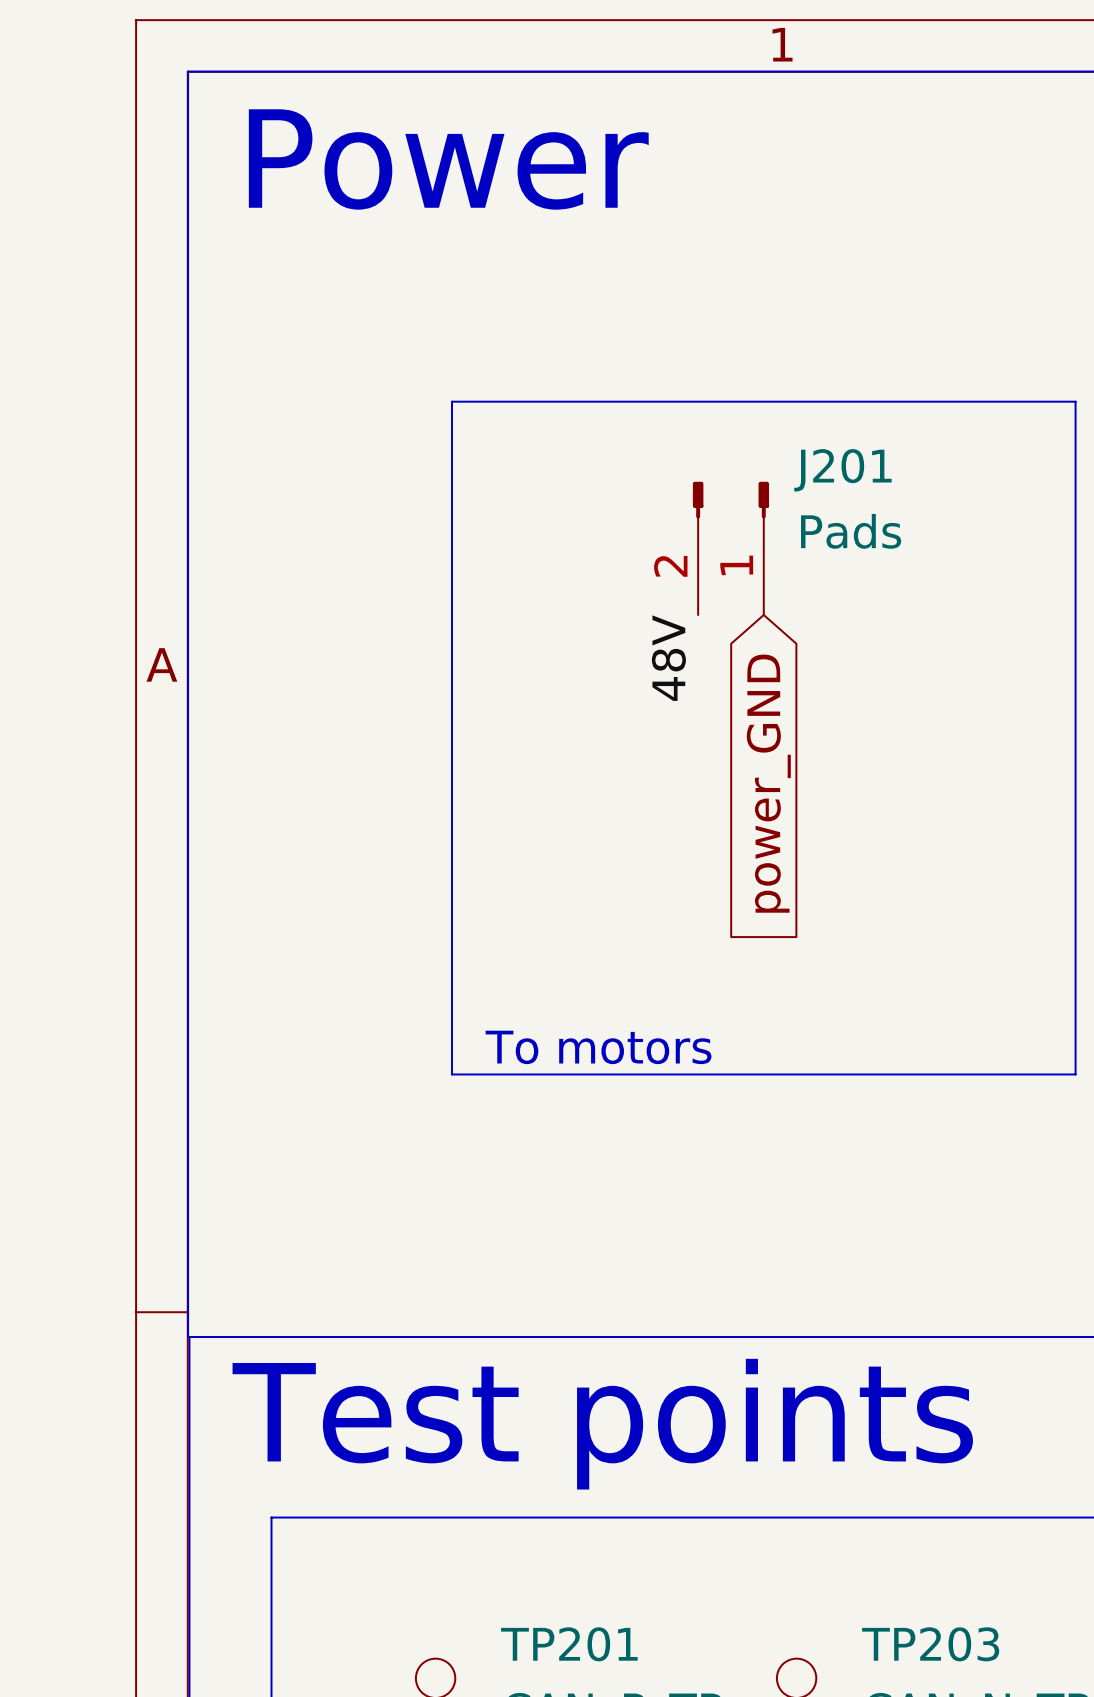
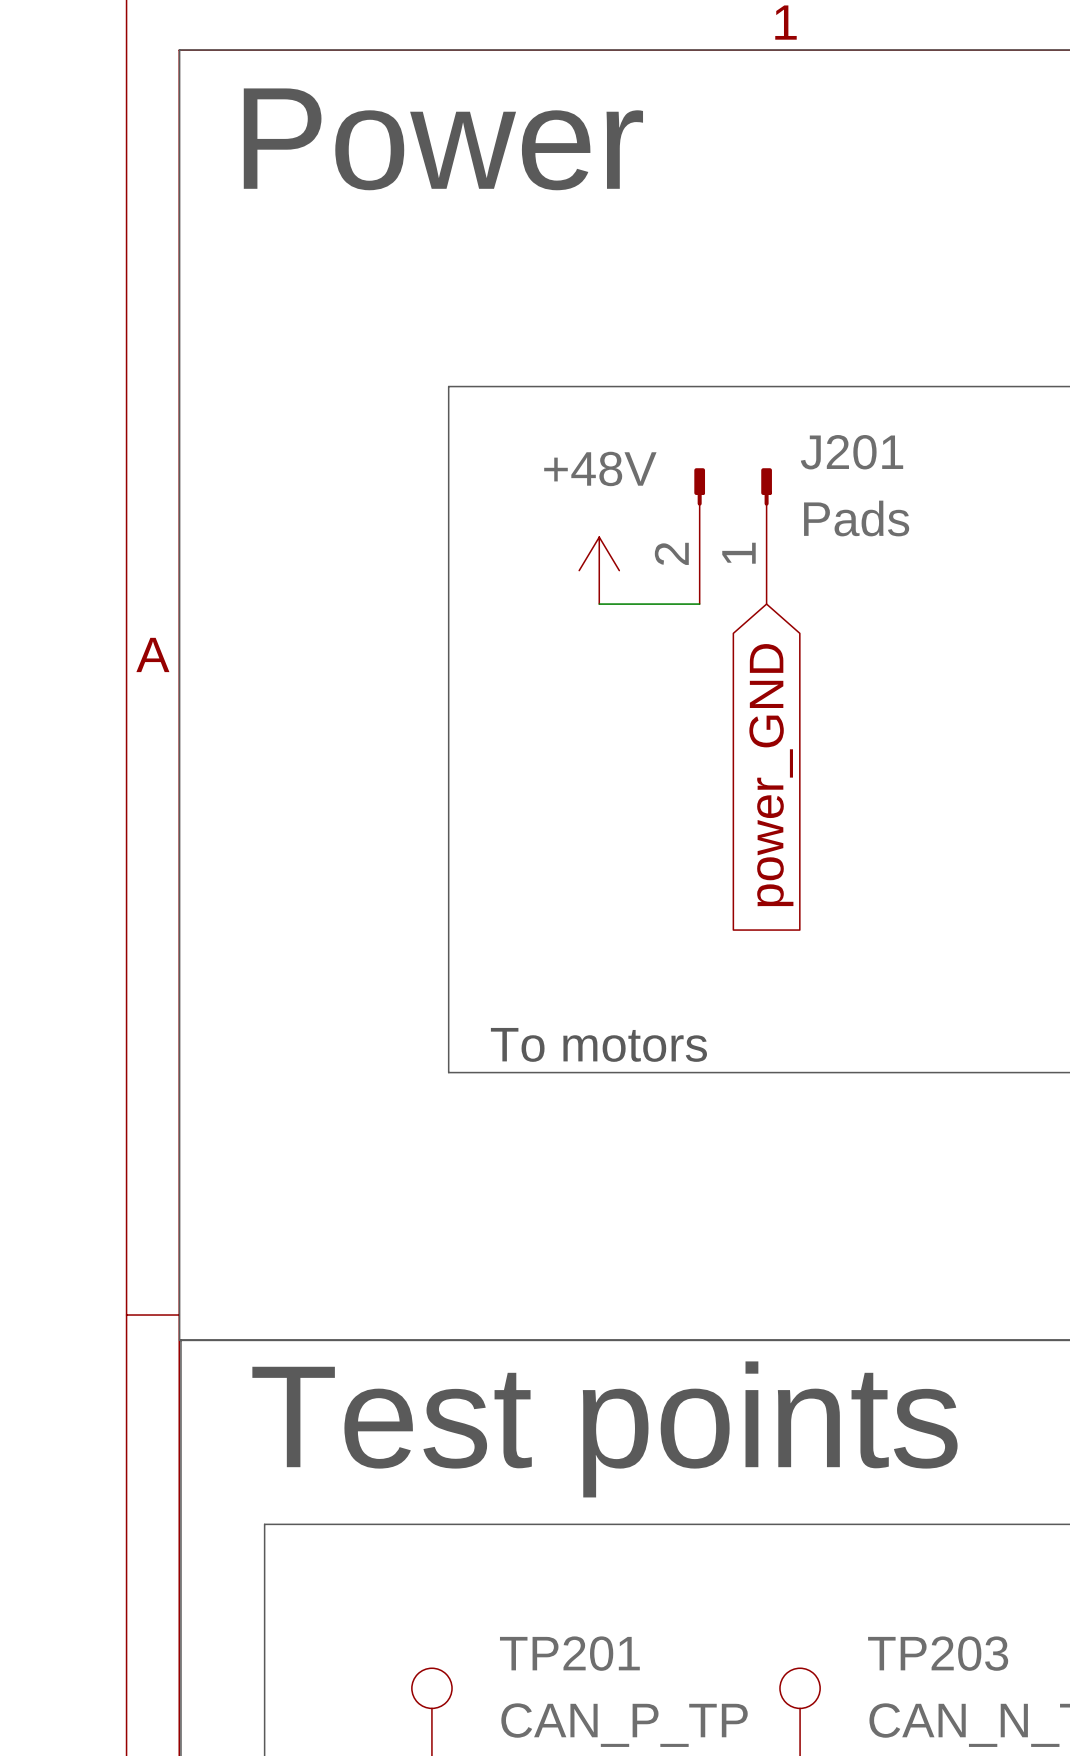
power symbol: none -> +48V (599, 570)
wire: none -> (599, 604) (699, 604)
label: 48V (668, 658) -> none

